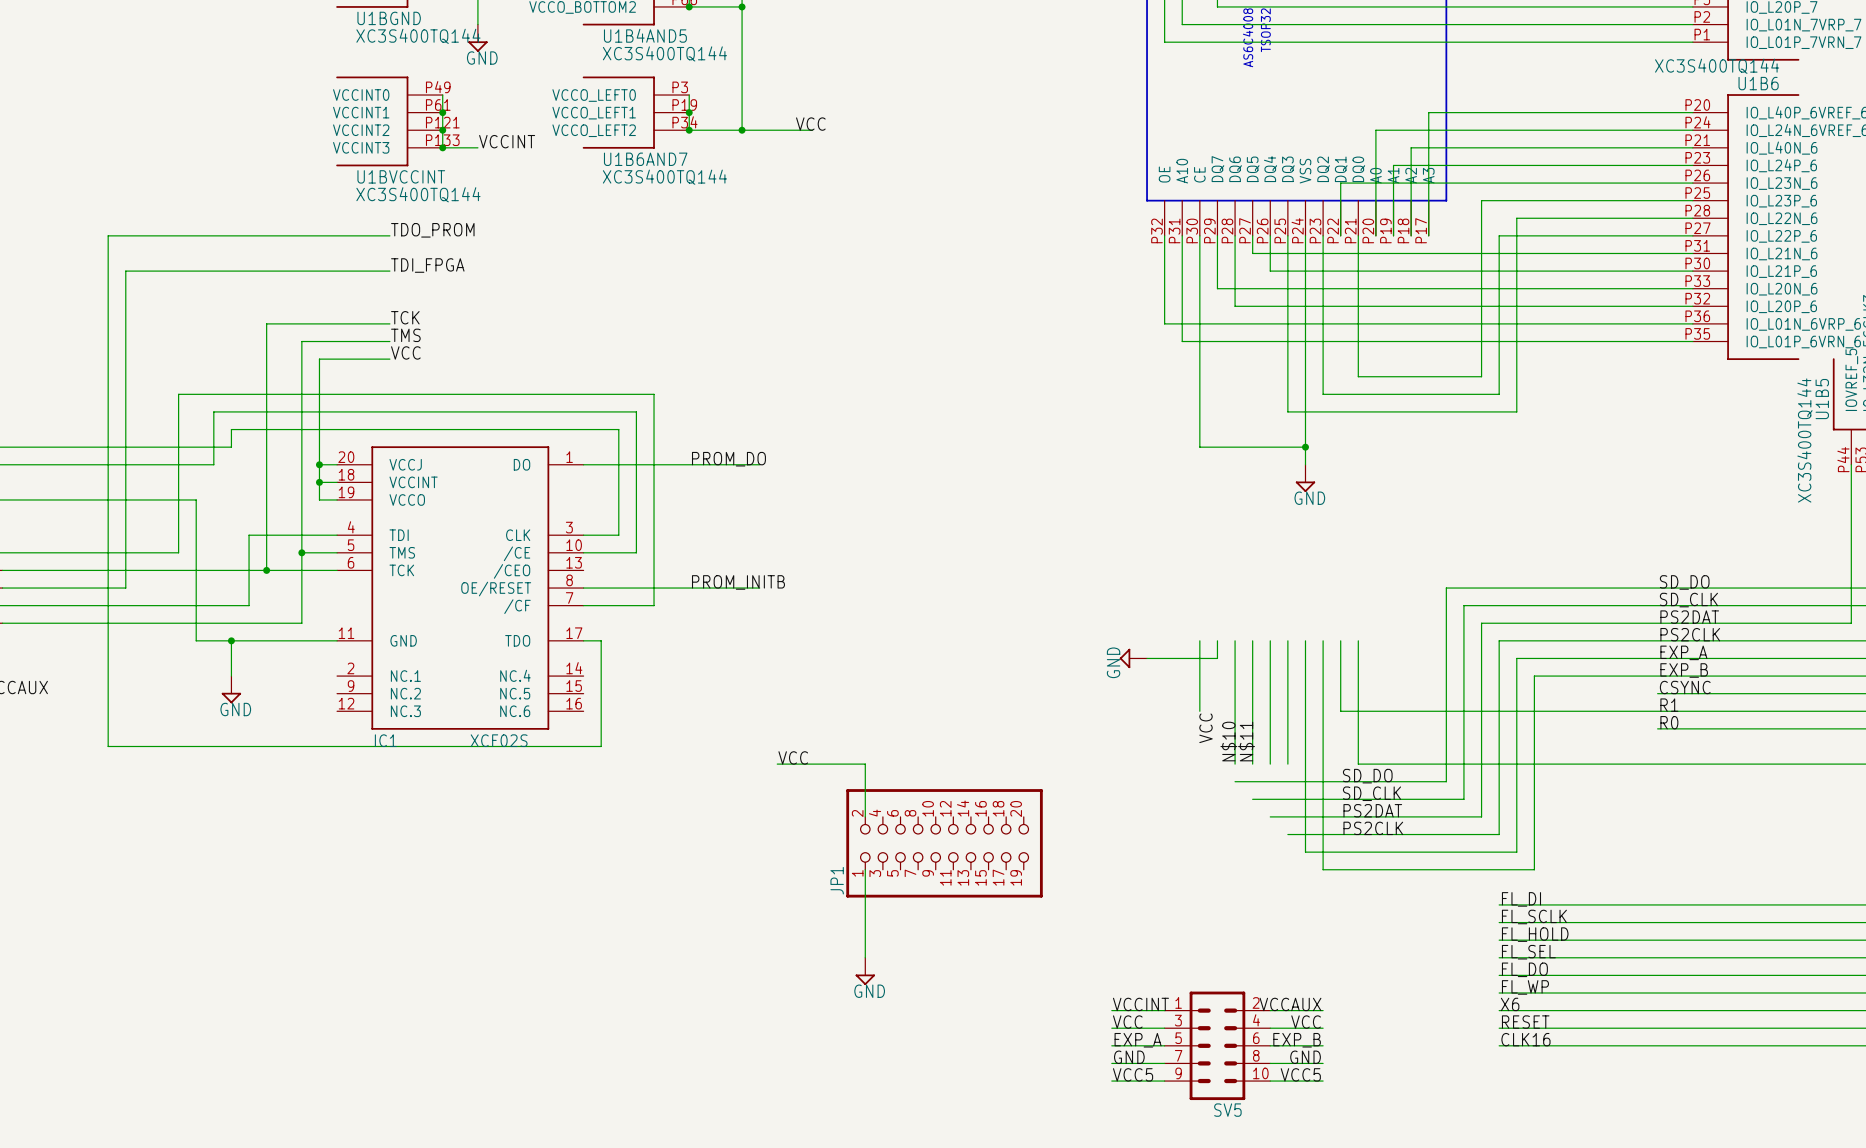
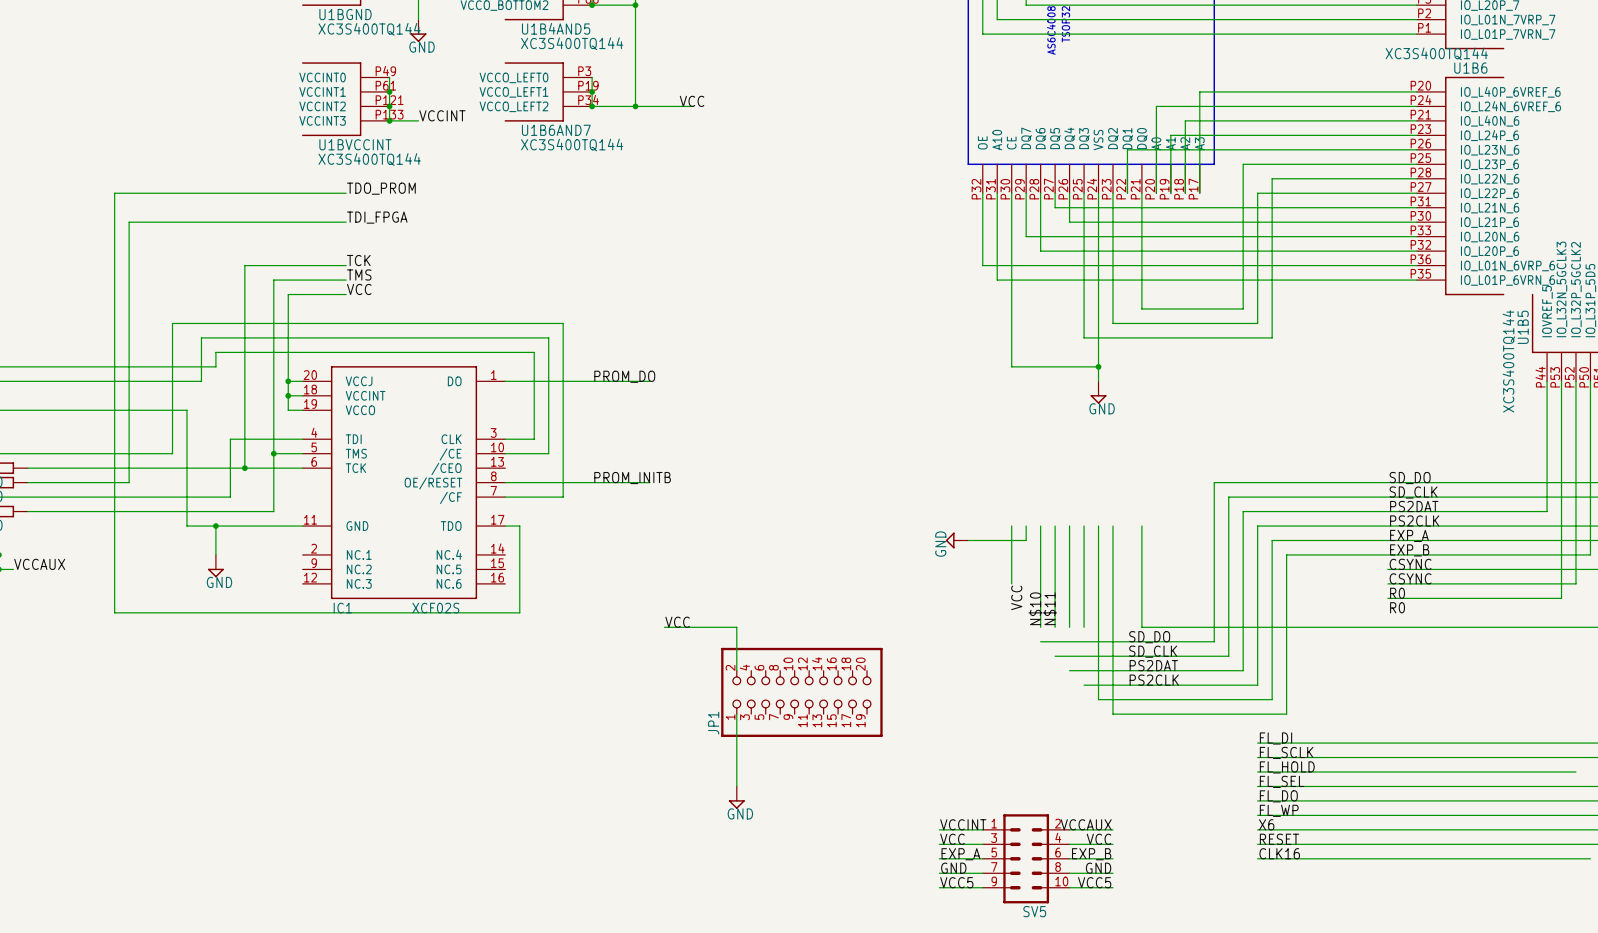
wire: (1340, 640) (1340, 711) (1657, 711) -> none
label: R1 (1669, 705) -> CSYNC (1410, 578)
label: none -> R0 (1397, 607)

